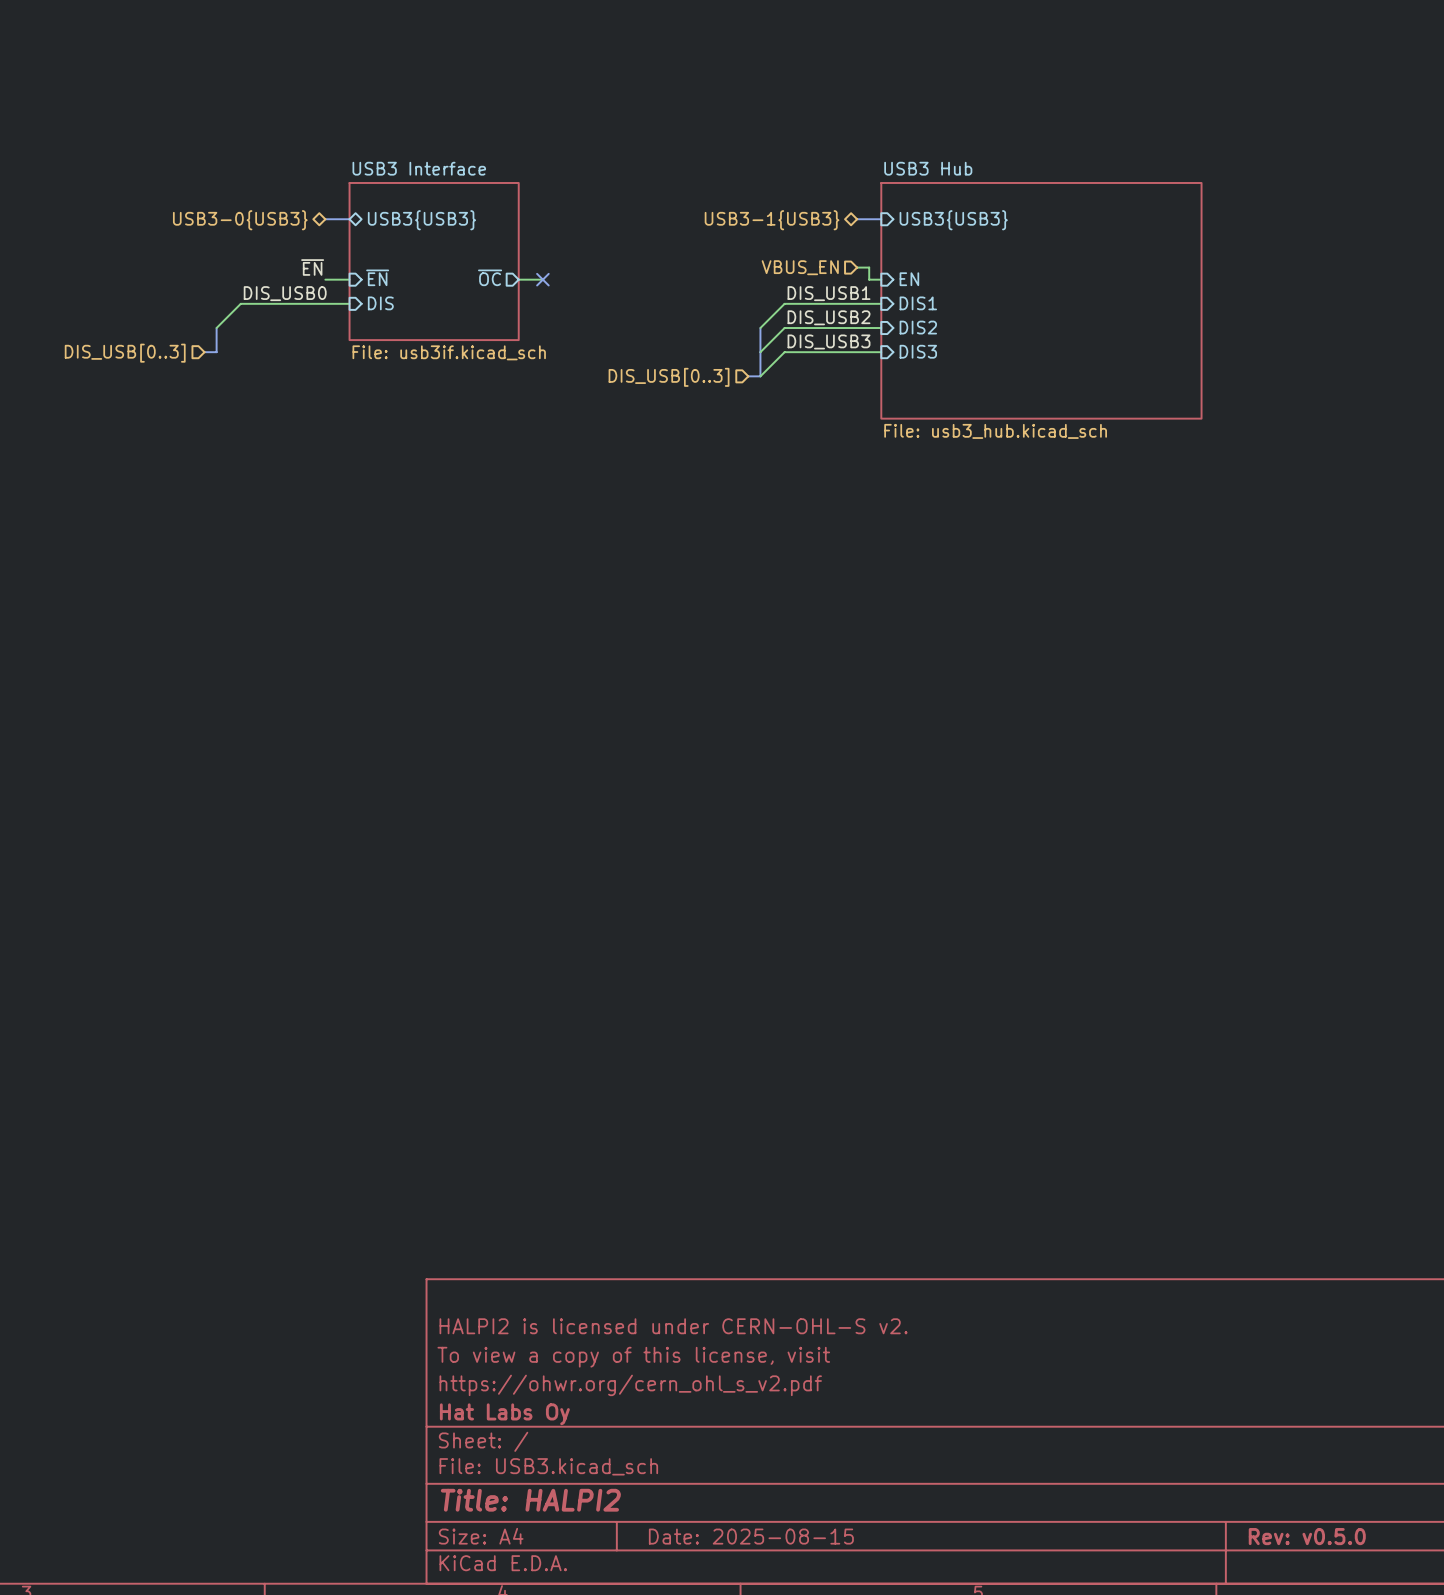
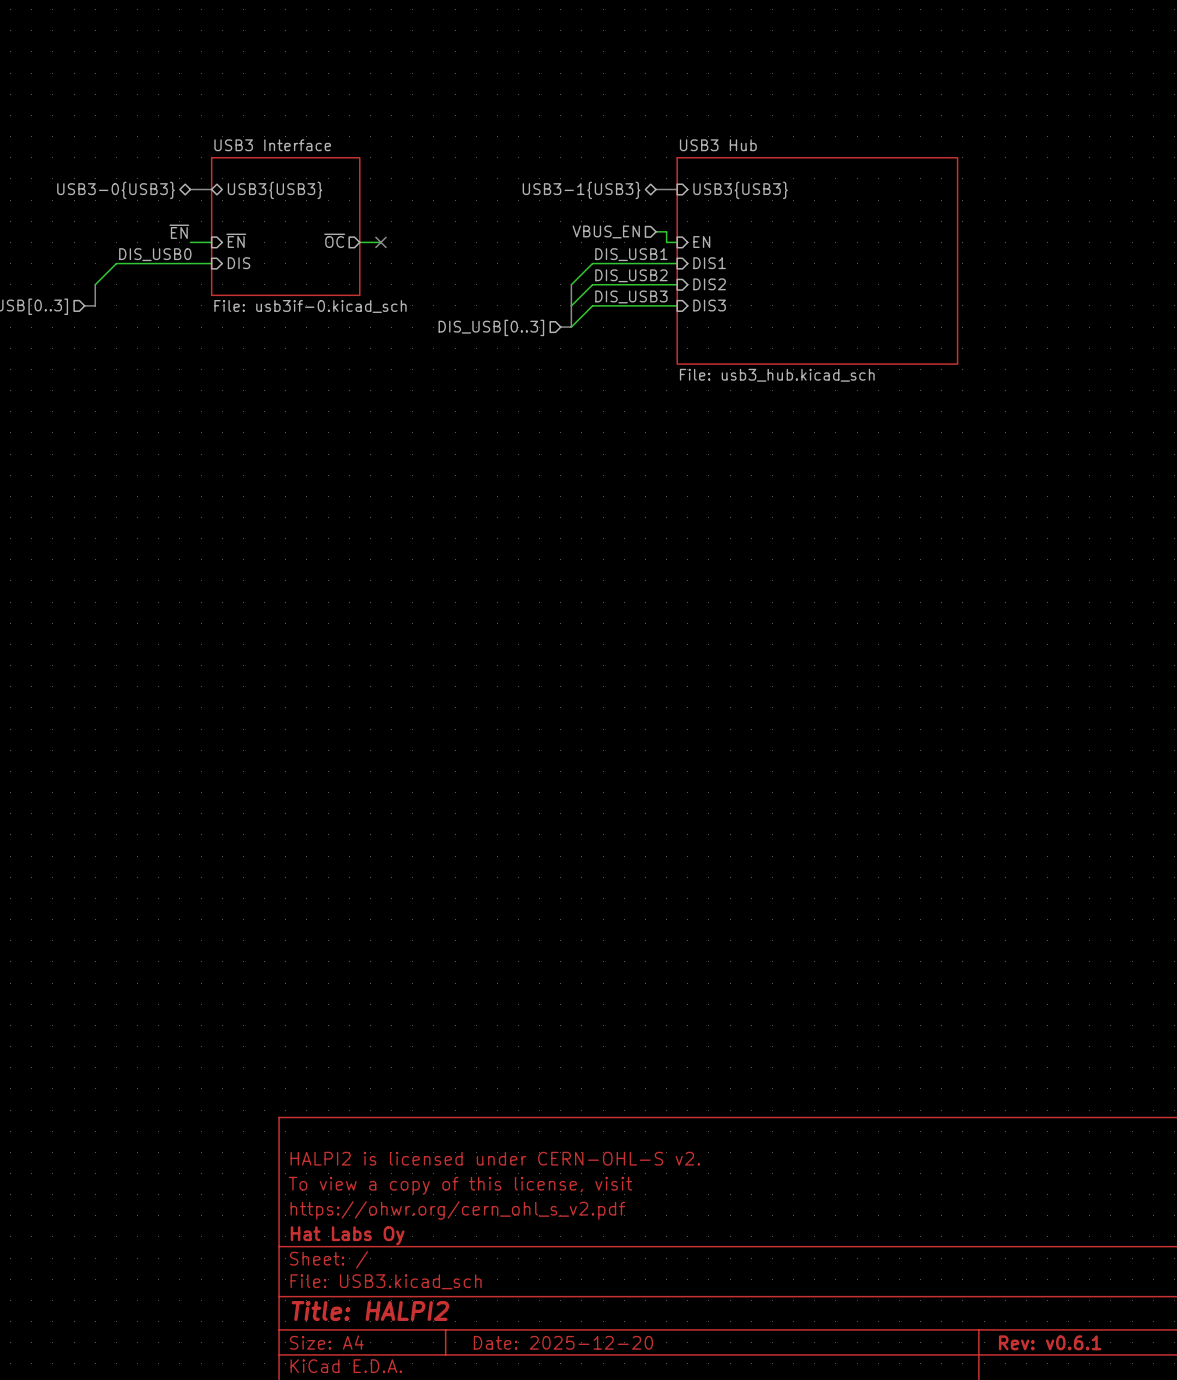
sheet USB3 Interface value: File: usb3if.kicad_sch (449, 352) -> File: usb3if-0.kicad_sch (310, 306)
title block: Date: 2025-08-15 (751, 1536) -> Date: 2025-12-20 (563, 1342)
title block: Rev: v0.5.0 (1307, 1536) -> Rev: v0.6.1 (1050, 1342)

